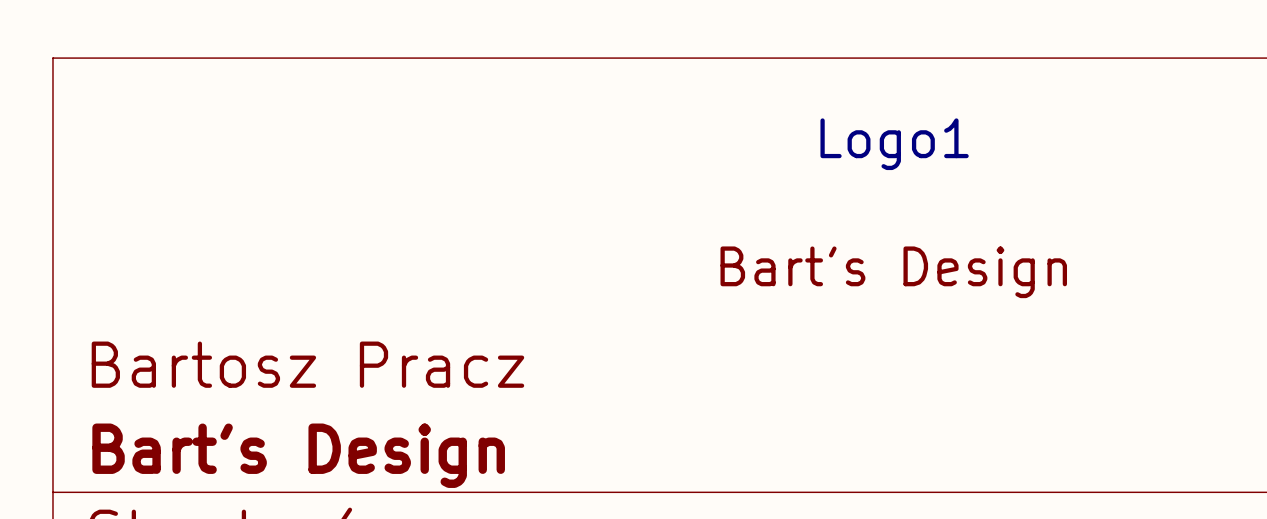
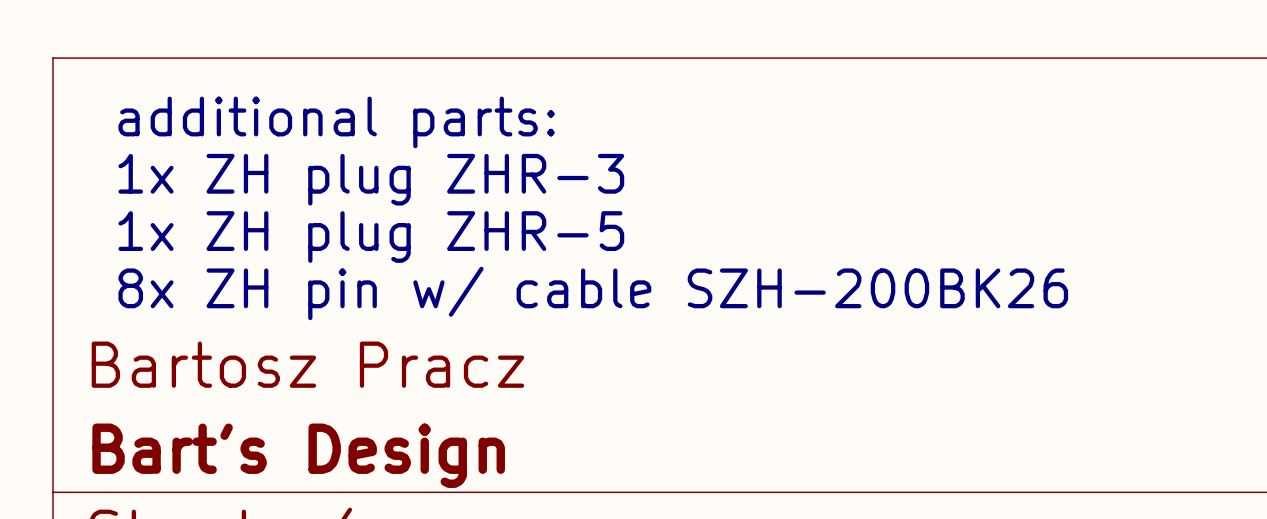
text: none -> additional parts: (336, 122)
text: none -> 1x ZH plug ZHR-3 (371, 179)
Logo1: (893, 208) -> none
text: none -> 1x ZH plug ZHR-5 (371, 237)
text: none -> 8x ZH pin w/ cable SZH-200BK26 (593, 293)

